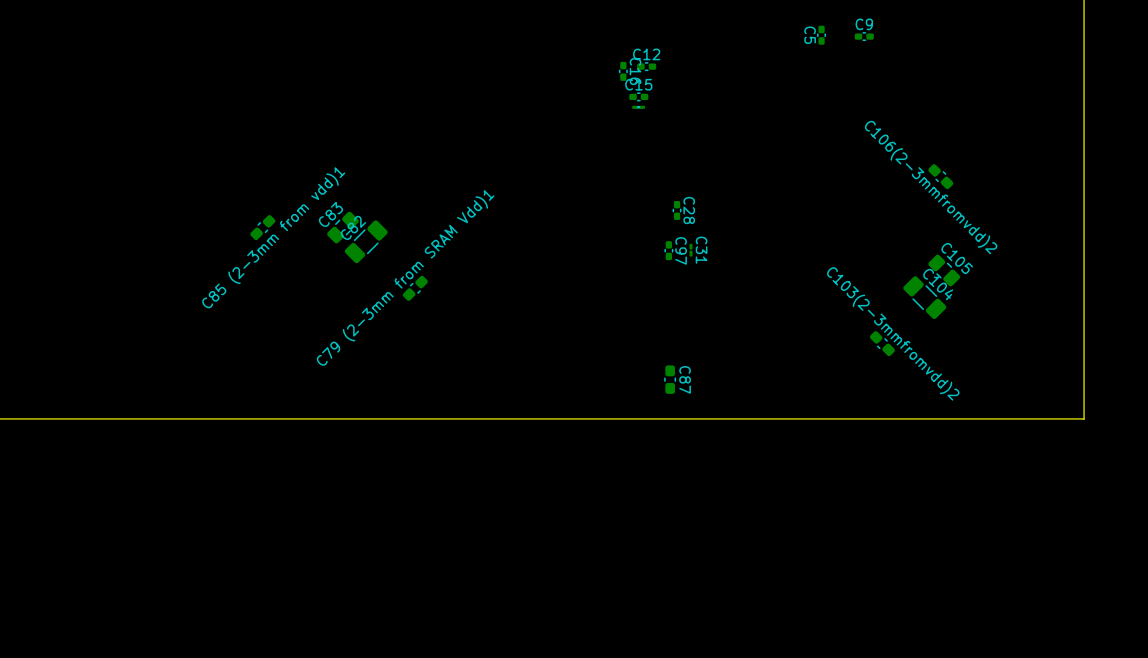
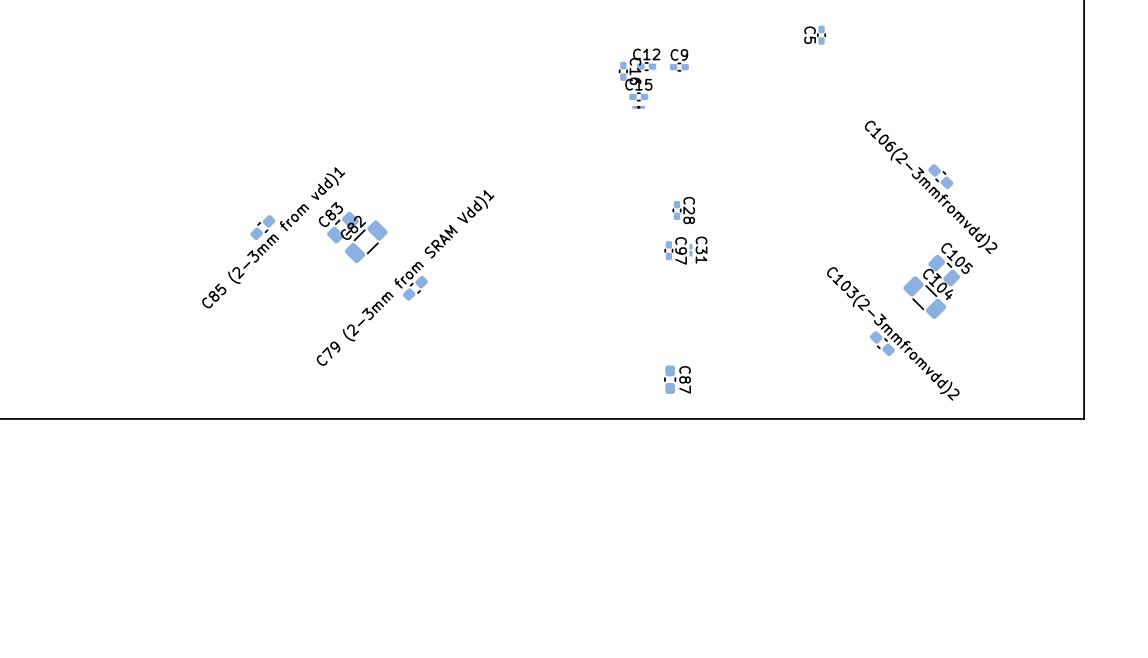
C9 position: (864, 36) -> (679, 67)

